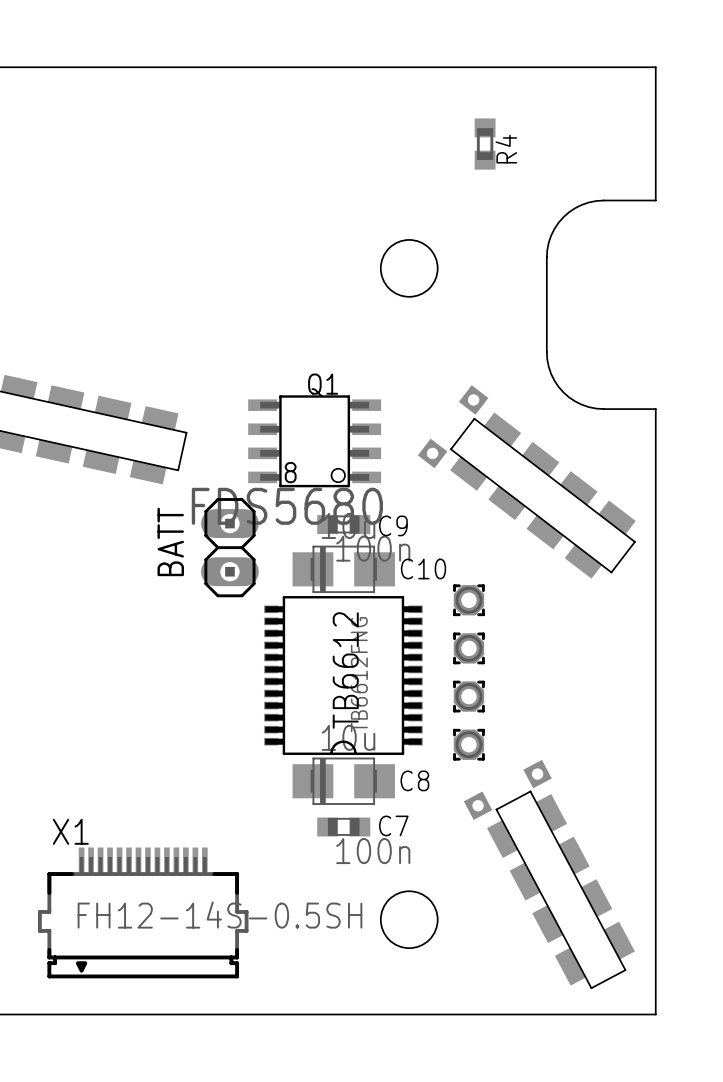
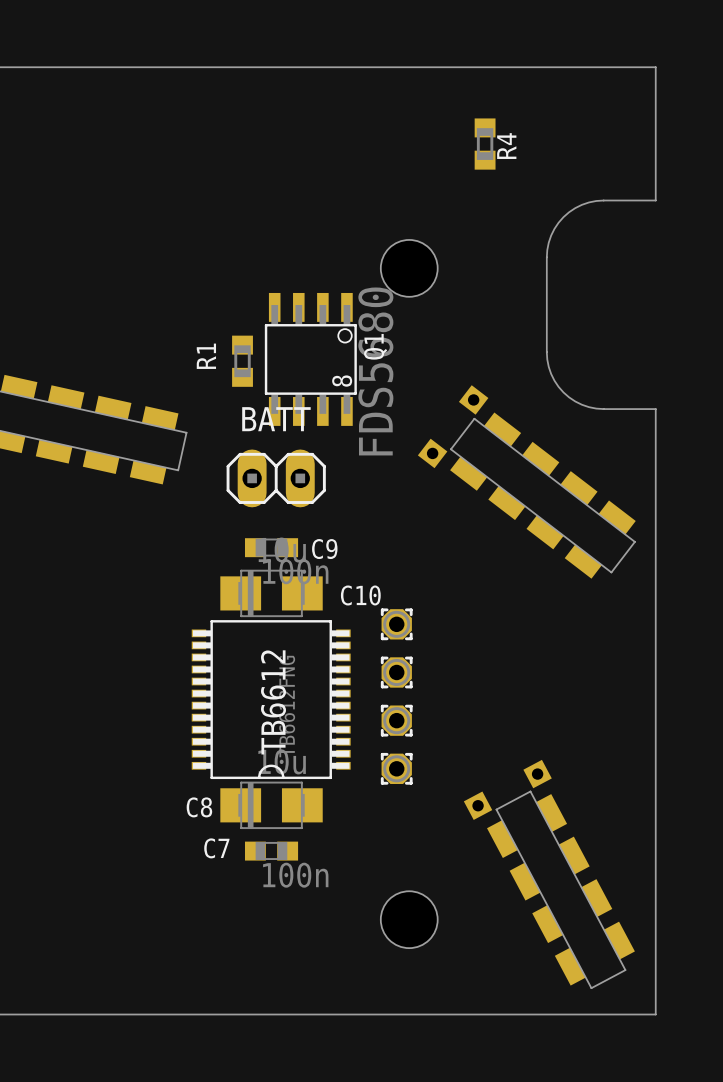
R1: none -> (242, 361)
Q1 name position: Q1 (323, 385) -> Q1 (375, 346)
Q1 rotation: 0° (314, 441) -> 90° counterclockwise (310, 359)
Q1 position: (314, 441) -> (310, 359)
C9 position: (343, 524) -> (271, 547)
BATT rotation: 0° (229, 547) -> 90° clockwise (276, 478)
BATT position: (229, 547) -> (276, 478)
C10 name position: C10 (423, 568) -> C10 (360, 595)
C10 position: (343, 569) -> (271, 593)
part: (468, 600) -> none
part: none -> (396, 624)
part: (468, 648) -> none
part: none -> (396, 672)
TB6612 position: (343, 675) -> (271, 699)
part: (468, 696) -> none
part: none -> (396, 720)
part: (468, 744) -> none
part: none -> (396, 768)
C8 name position: C8 (414, 780) -> C8 (199, 807)
C8 position: (343, 781) -> (271, 805)
C7 name position: C7 (393, 825) -> C7 (216, 848)
C7 position: (343, 827) -> (271, 851)
X1: FH12-14S-0.5SH (143, 912) -> none

